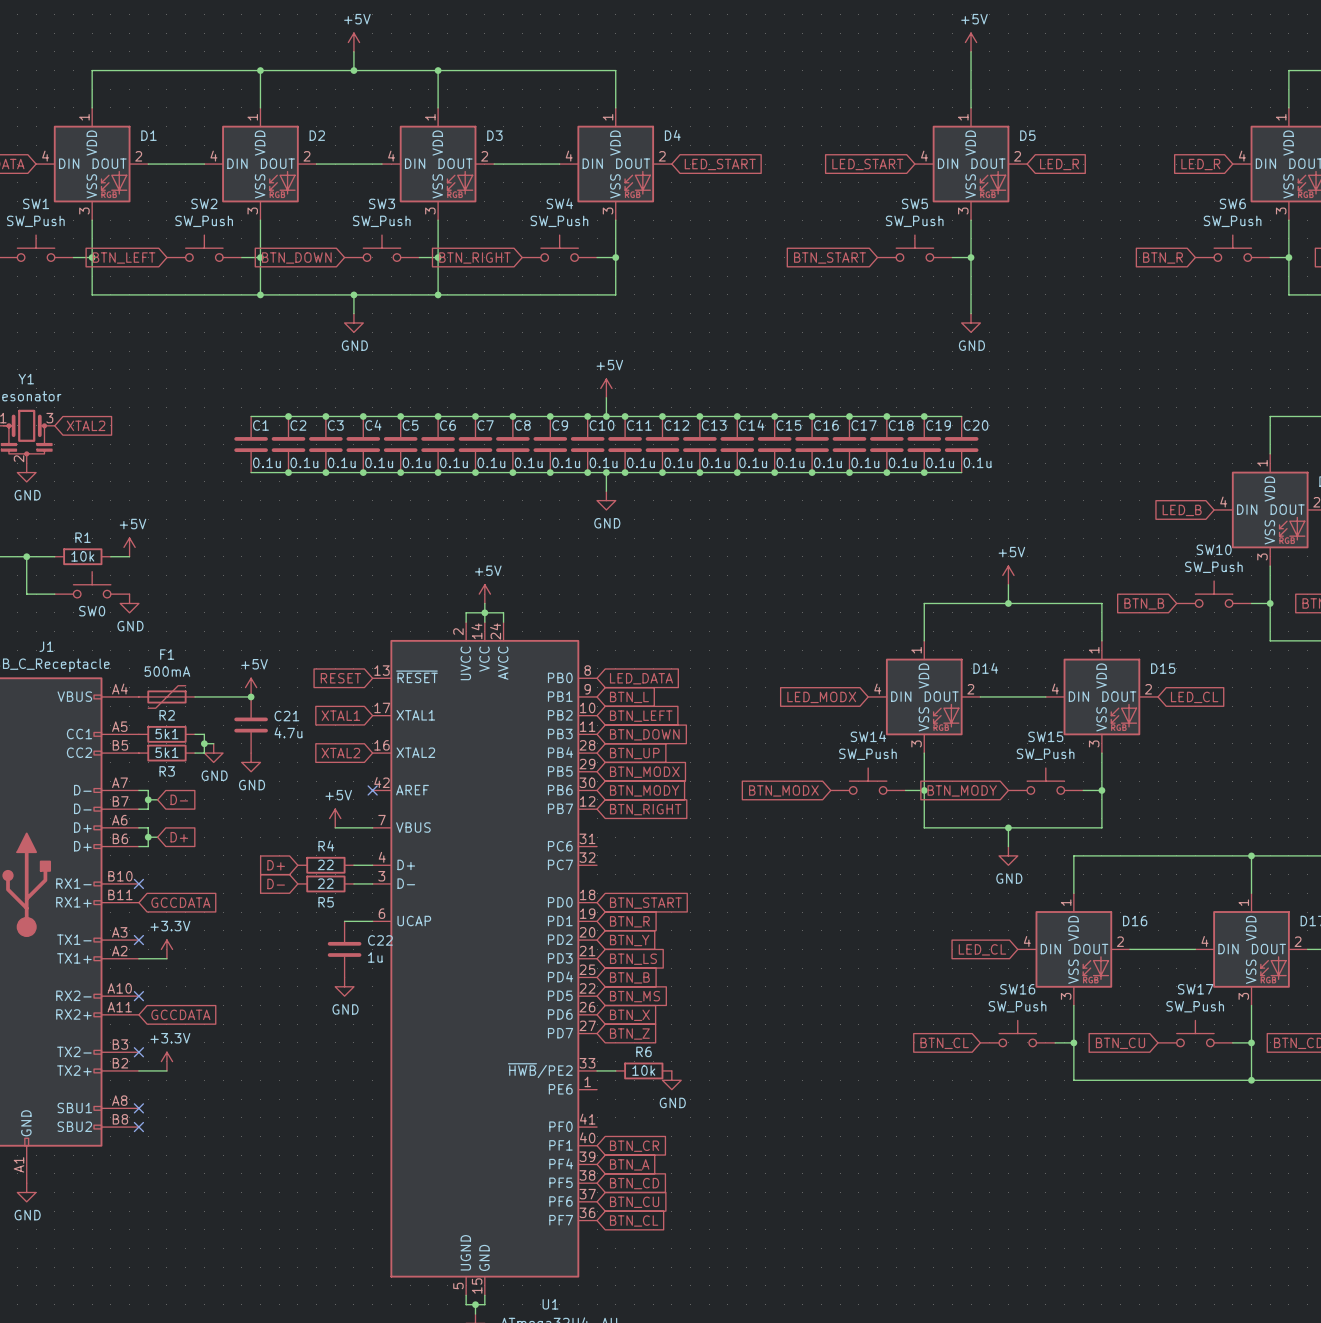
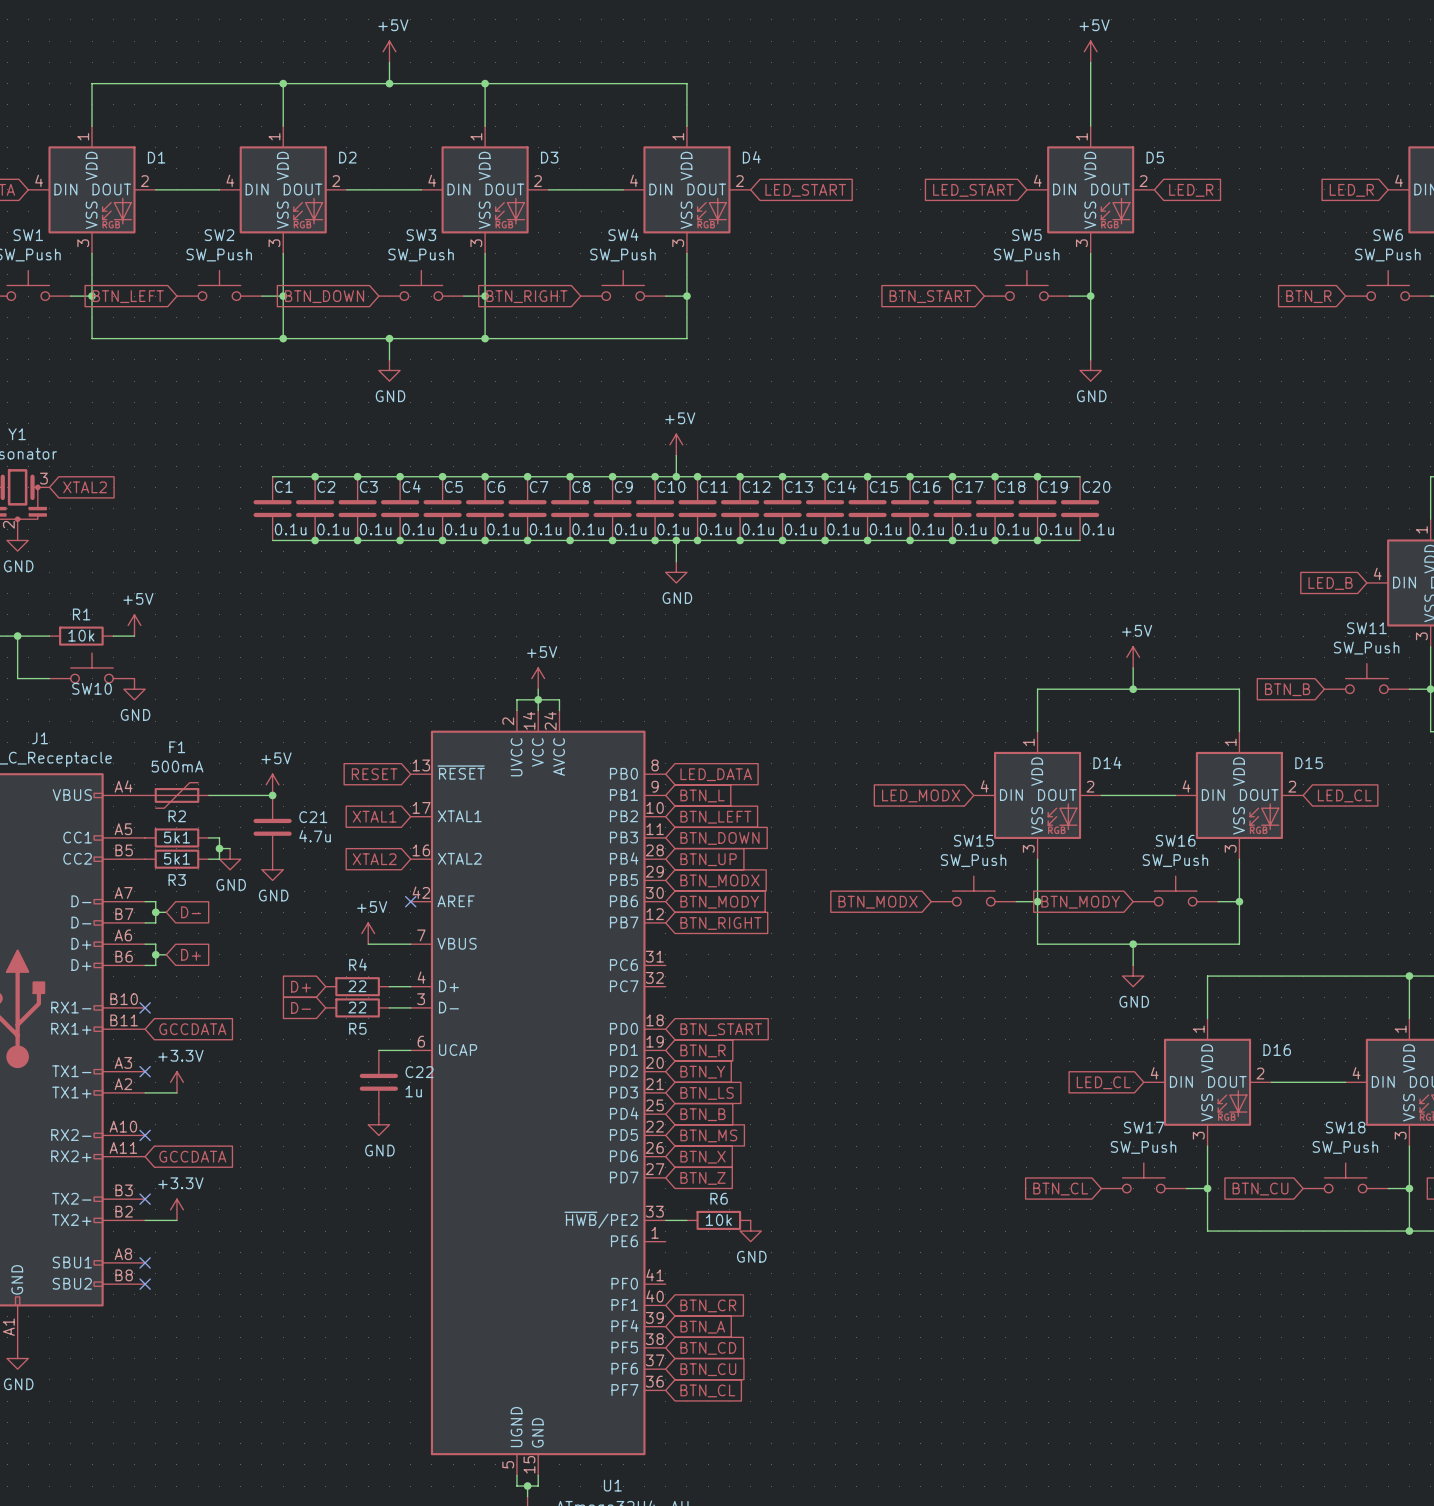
SW10 name: SW10 (1214, 549) -> SW11 (1366, 628)
SW0 name: SW0 (92, 611) -> SW10 (92, 688)
SW14 name: SW14 (868, 736) -> SW15 (973, 840)
SW15 name: SW15 (1045, 736) -> SW16 (1175, 840)
SW16 name: SW16 (1017, 989) -> SW17 (1144, 1127)
SW17 name: SW17 (1195, 989) -> SW18 (1345, 1127)

